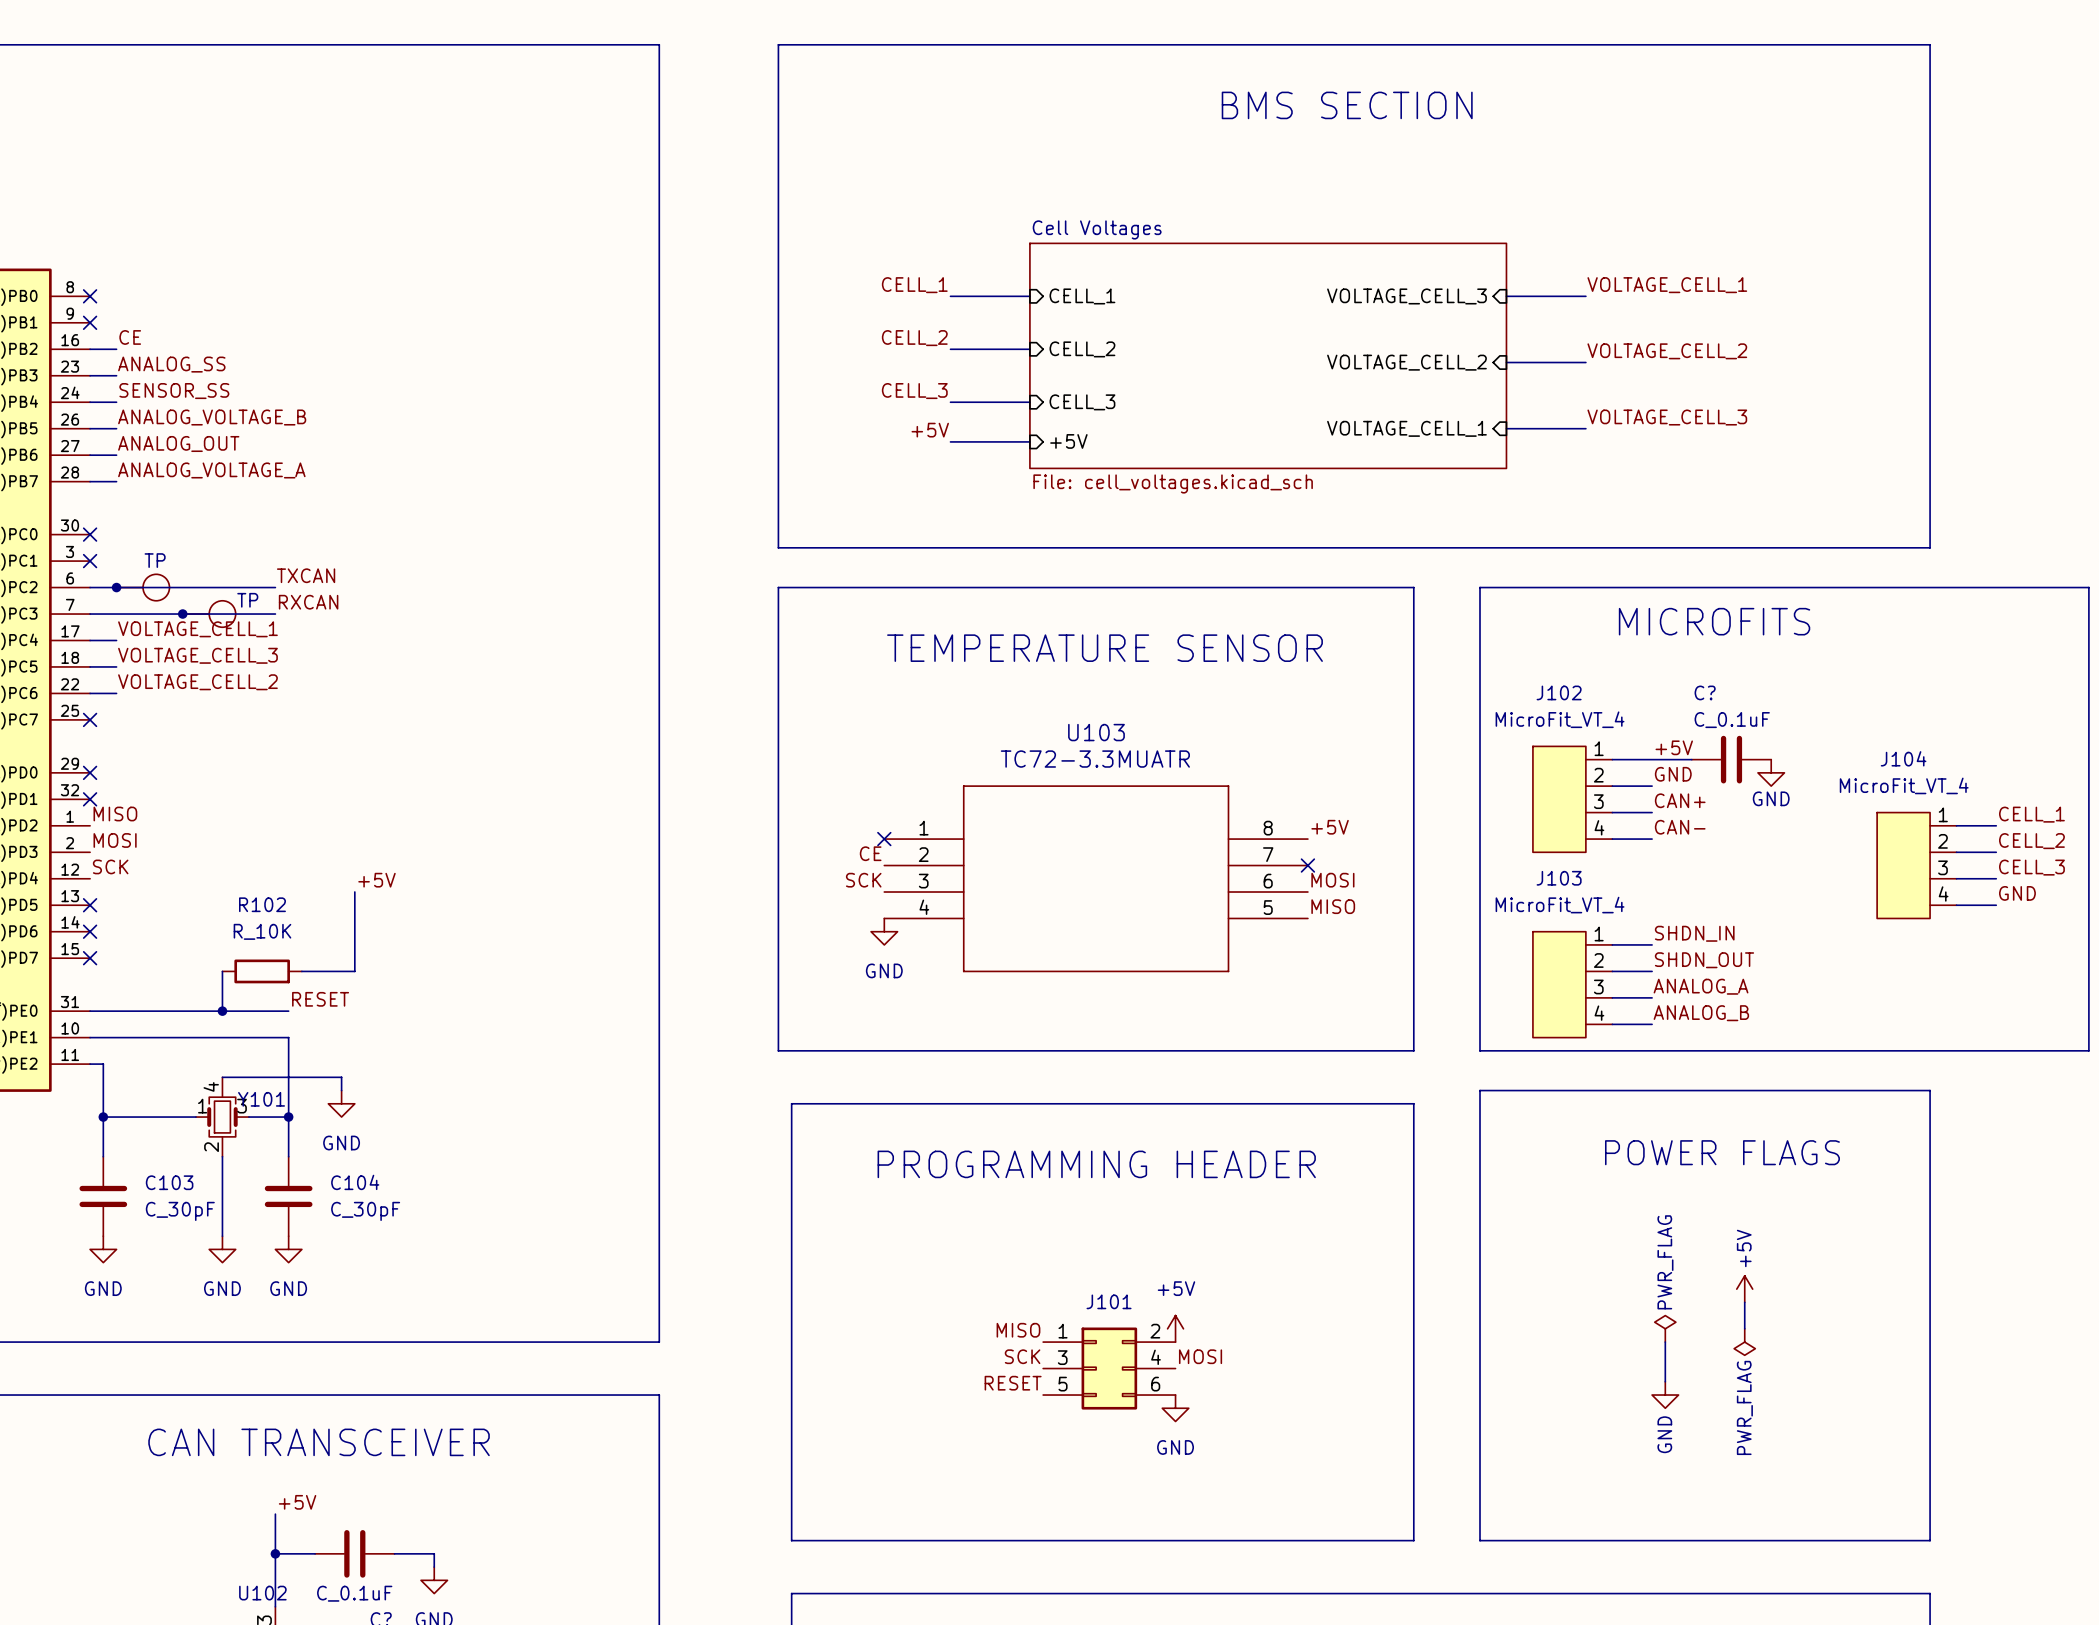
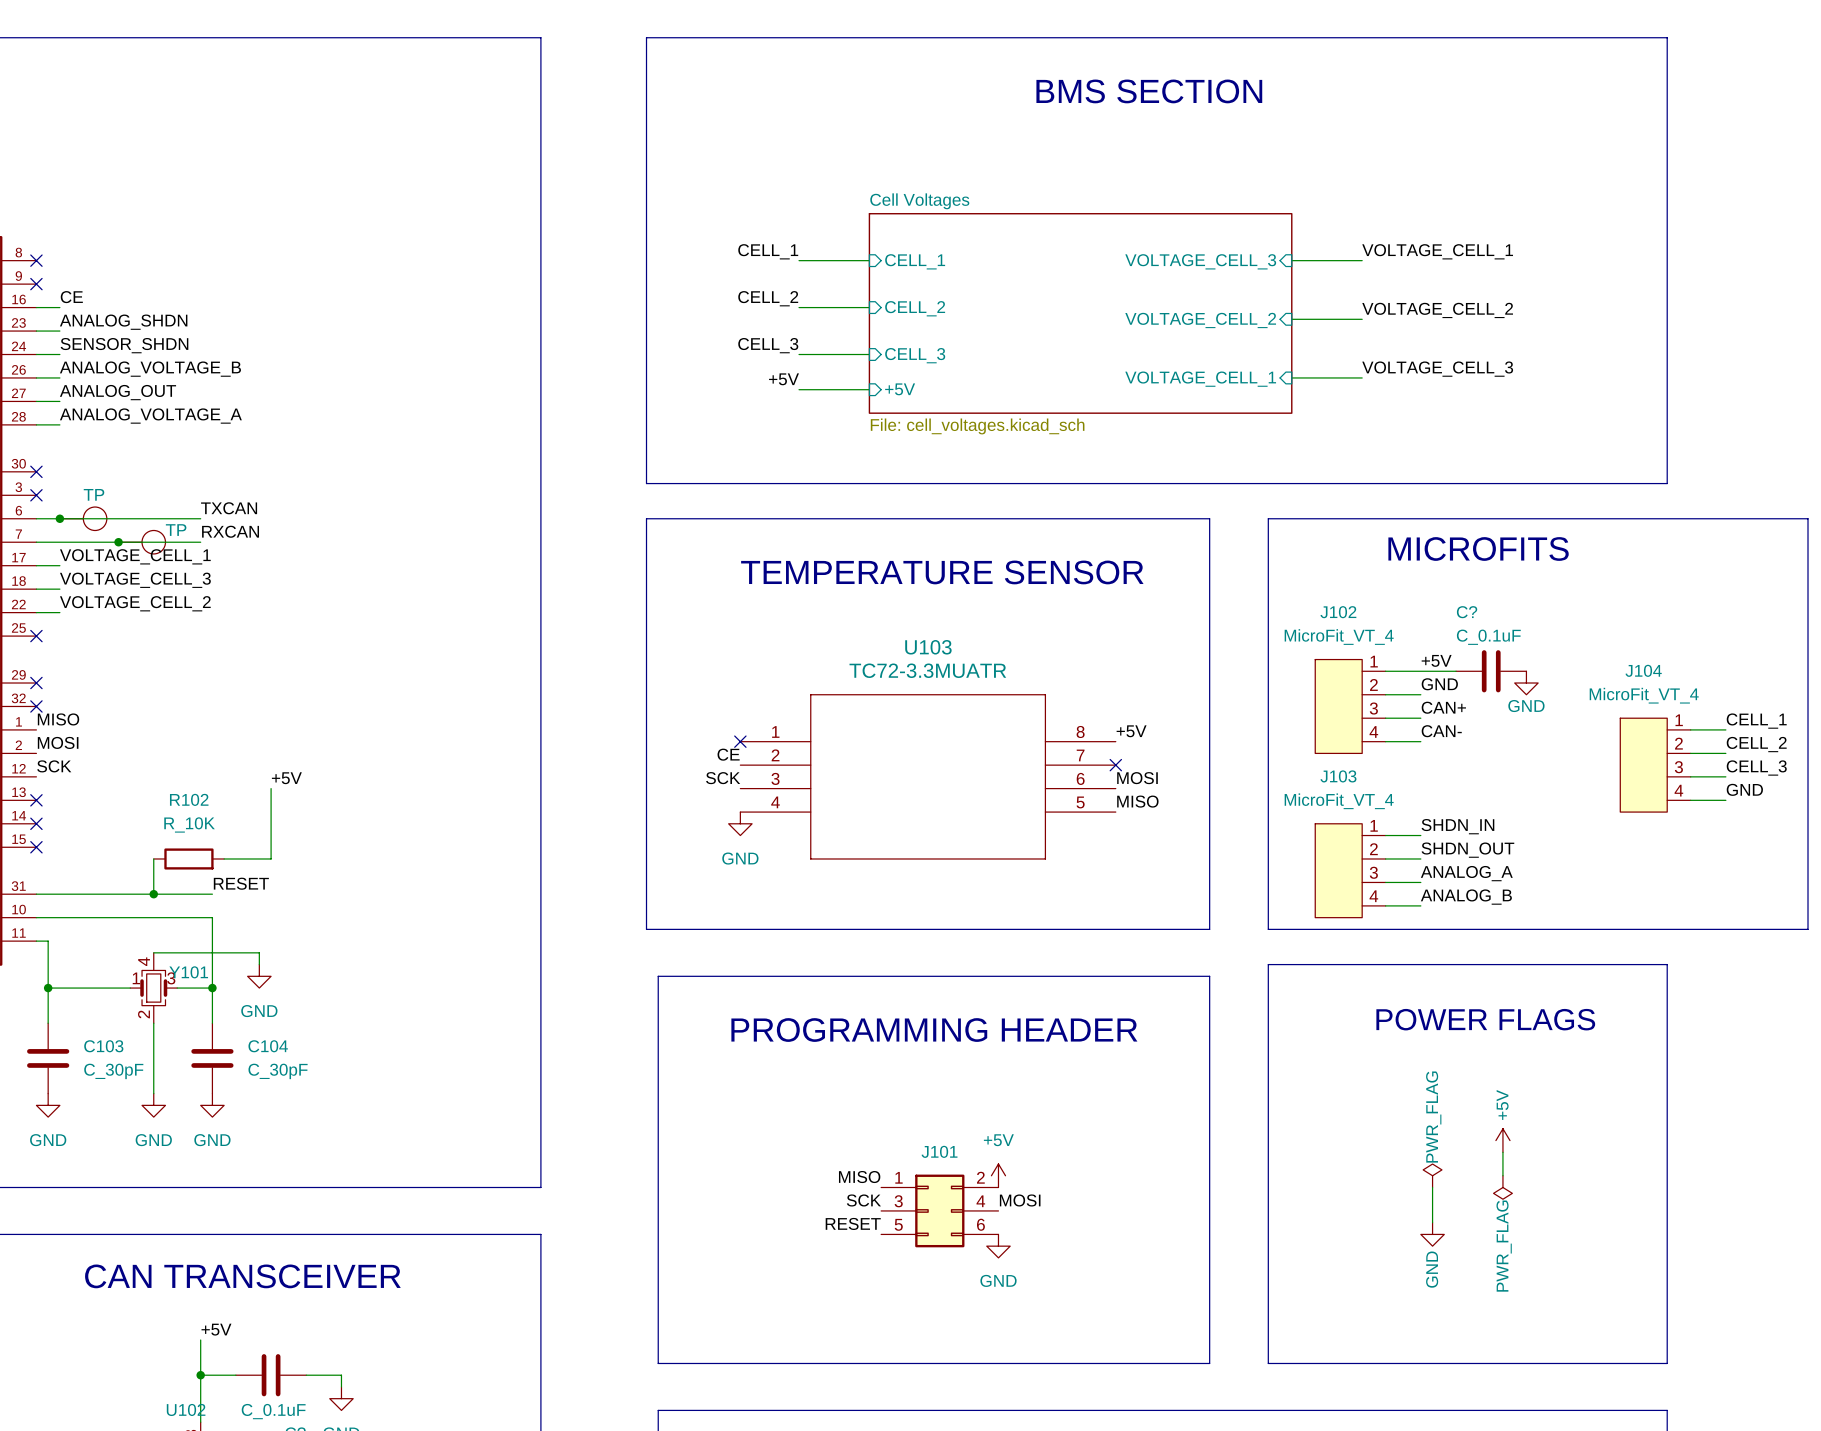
label: ANALOG_SS (171, 364) -> ANALOG_SHDN (123, 322)
label: SENSOR_SS (174, 391) -> SENSOR_SHDN (124, 345)

